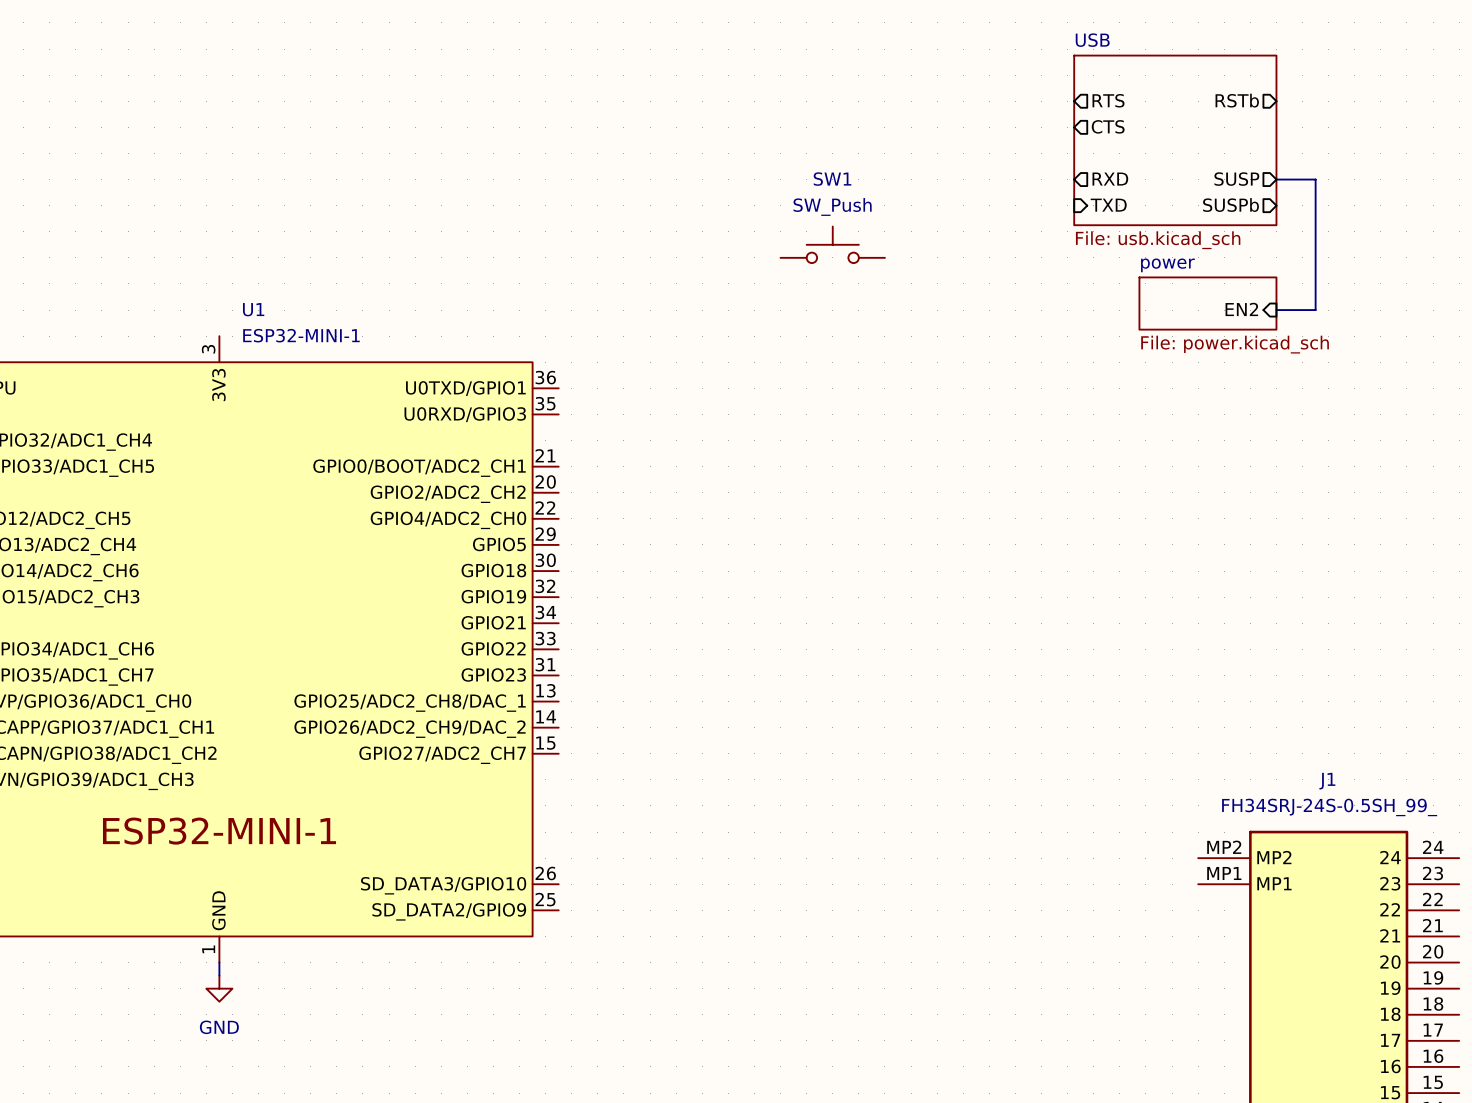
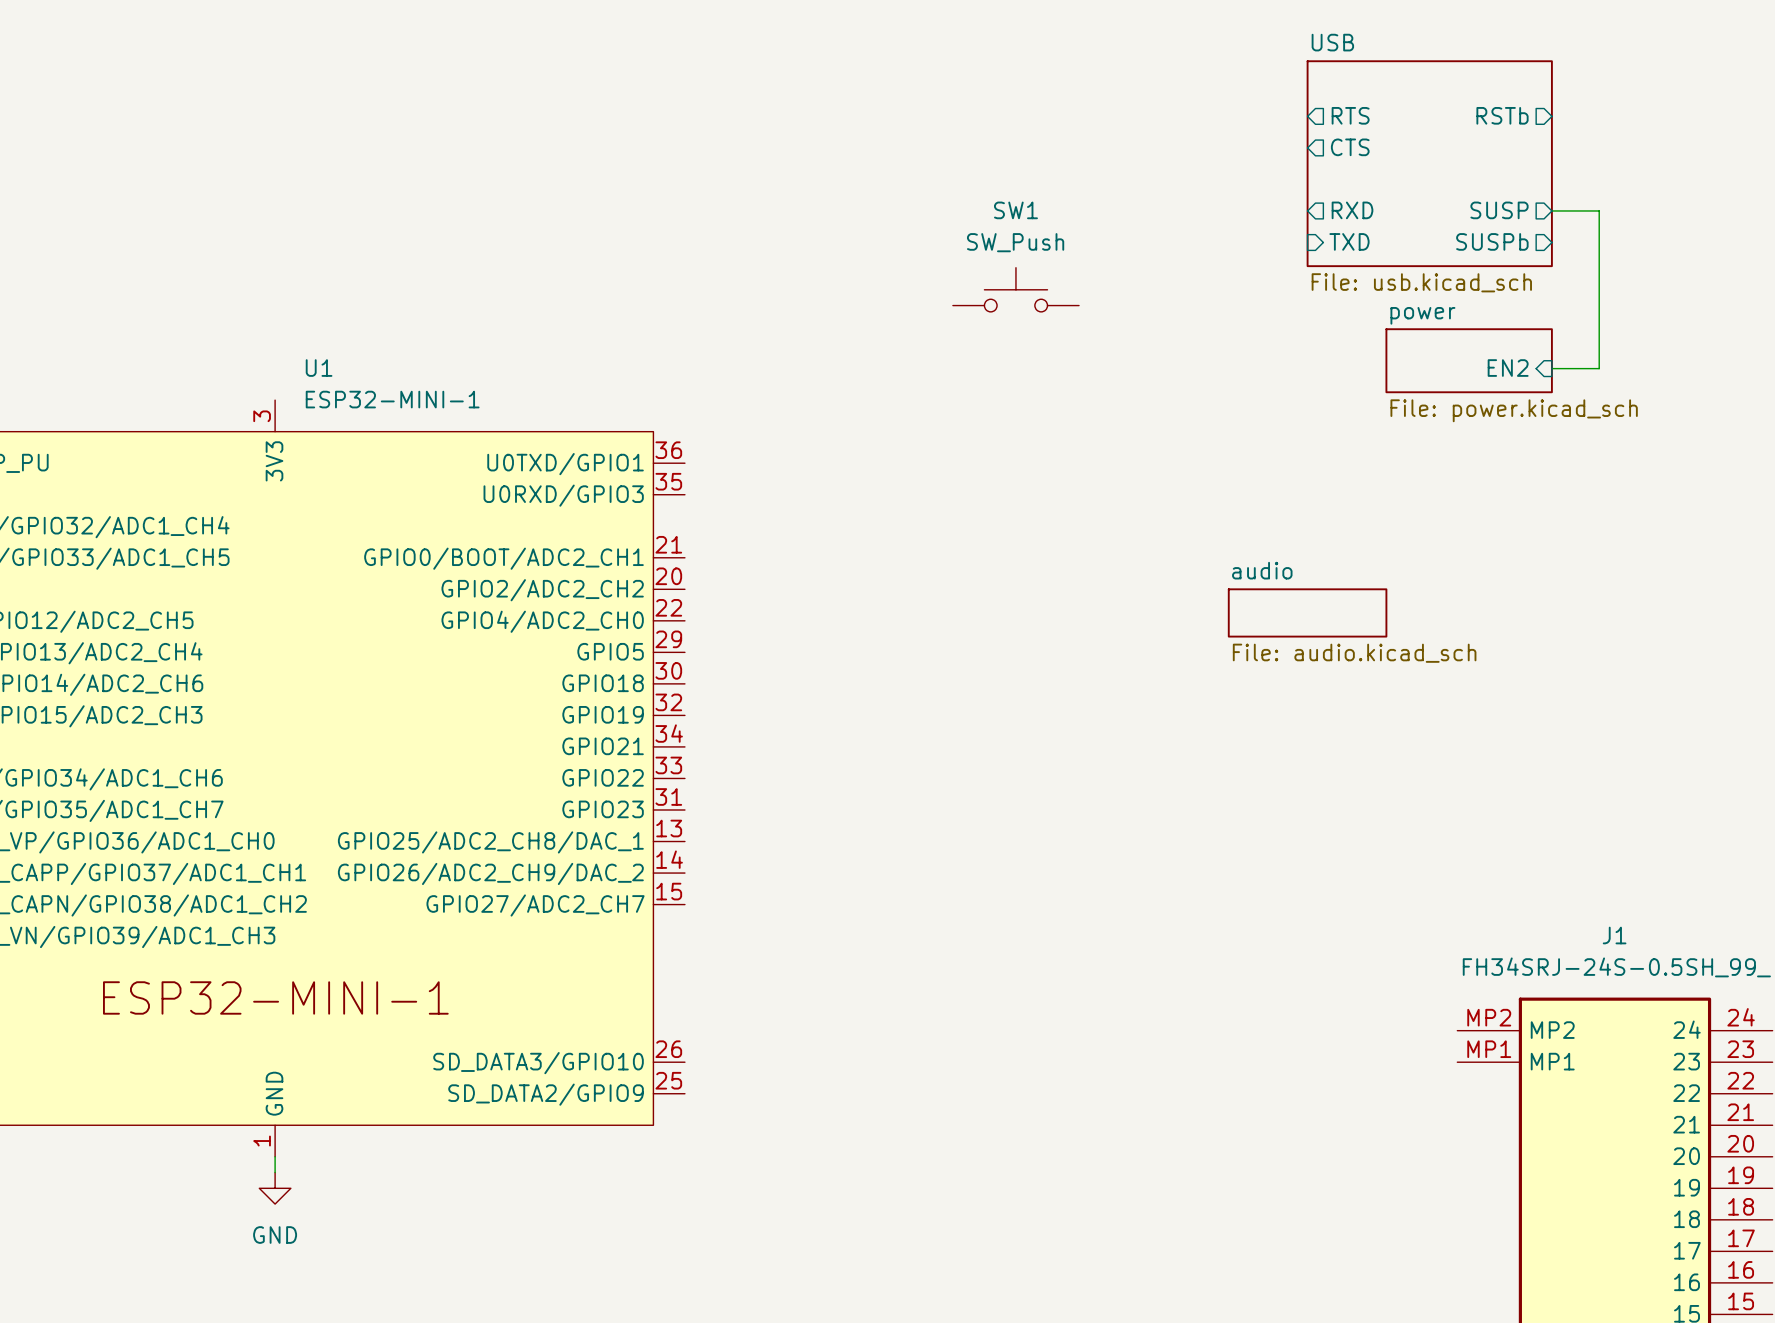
sheet audio: none -> File: audio.kicad_sch (1307, 612)

